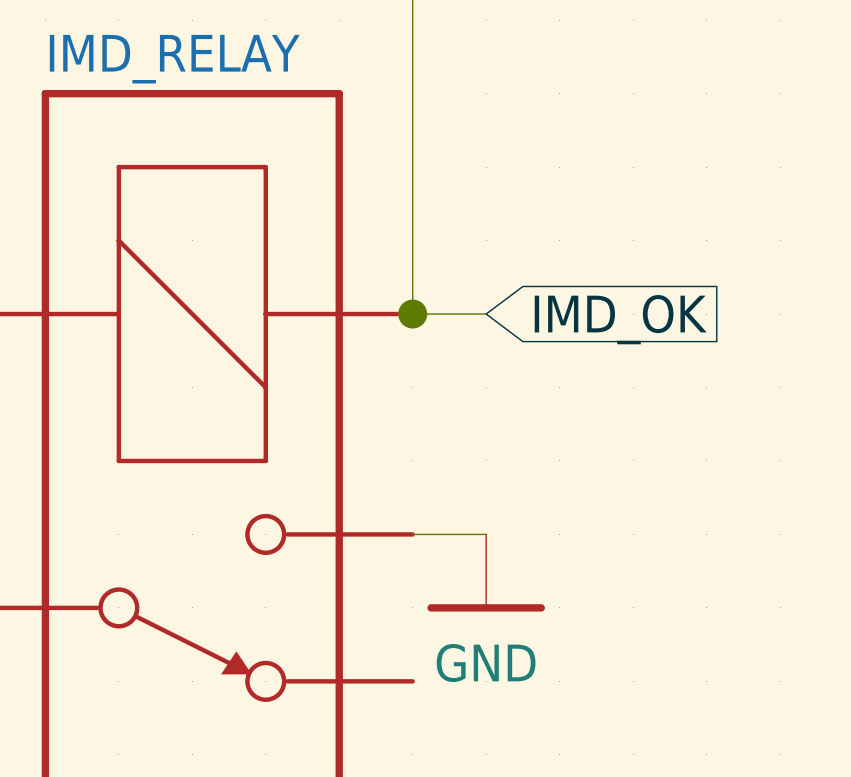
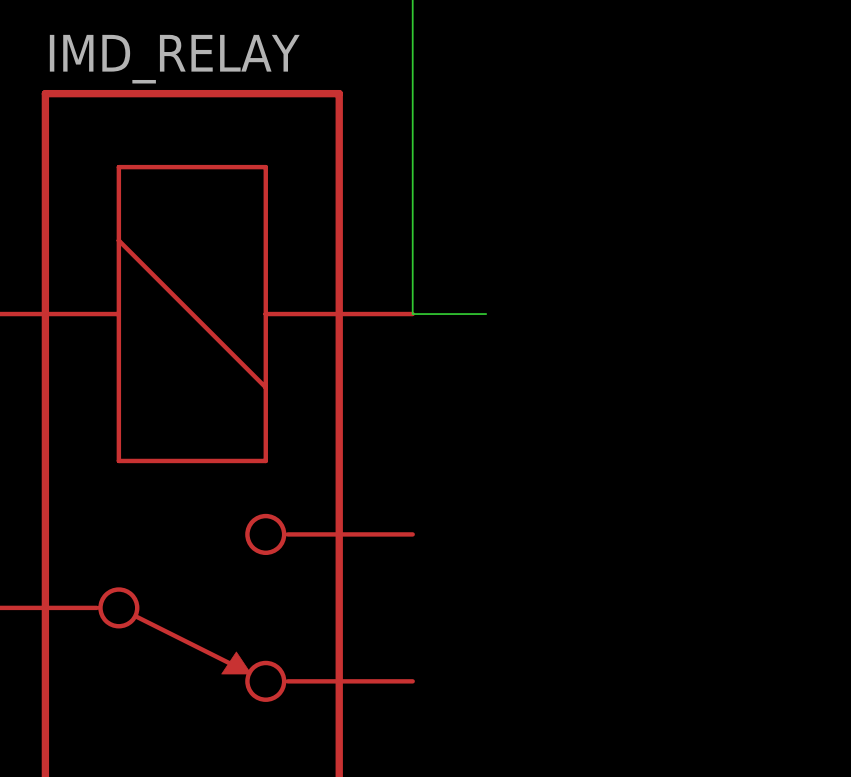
junction: (412, 314) -> none
global label: IMD_OK (620, 319) -> none
wire: (412, 534) (486, 534) -> none
power symbol: GND (486, 573) -> none

